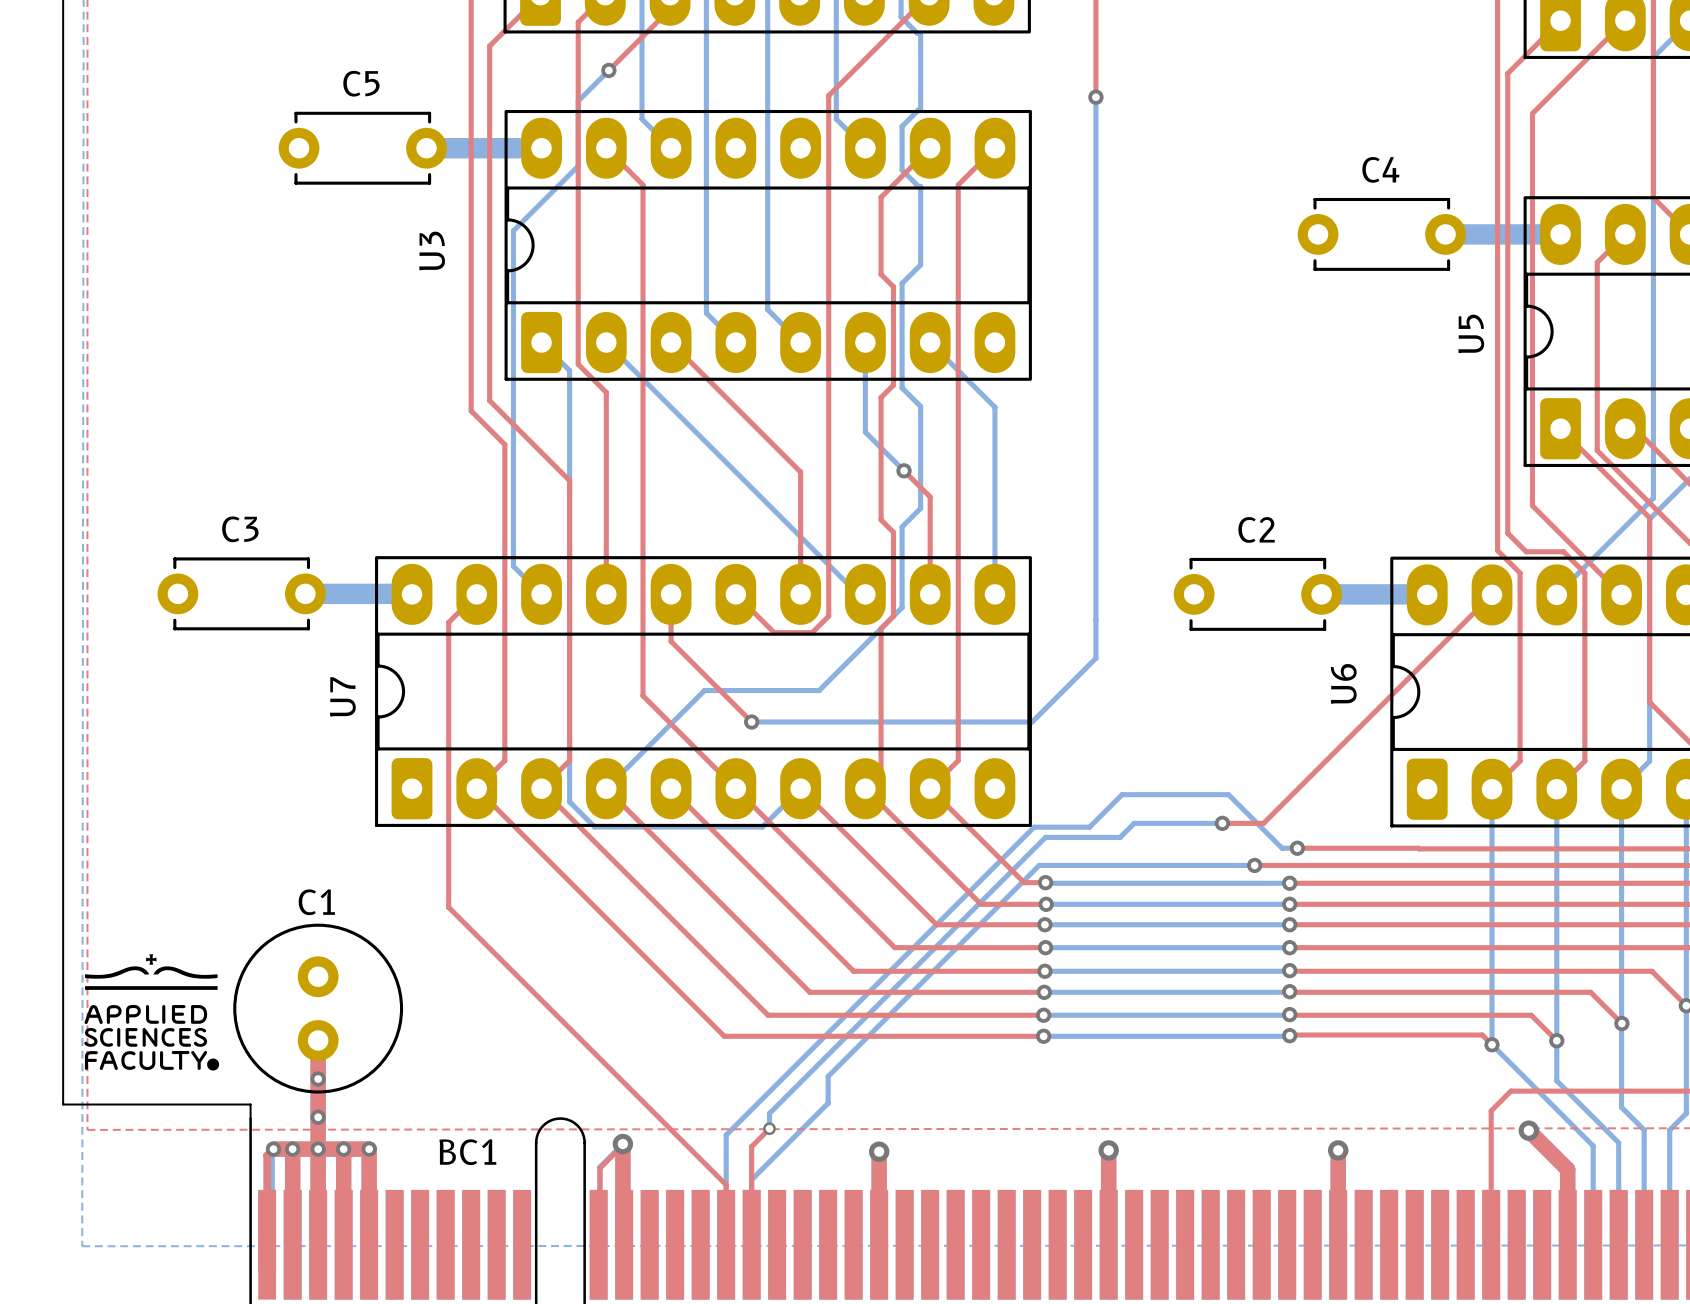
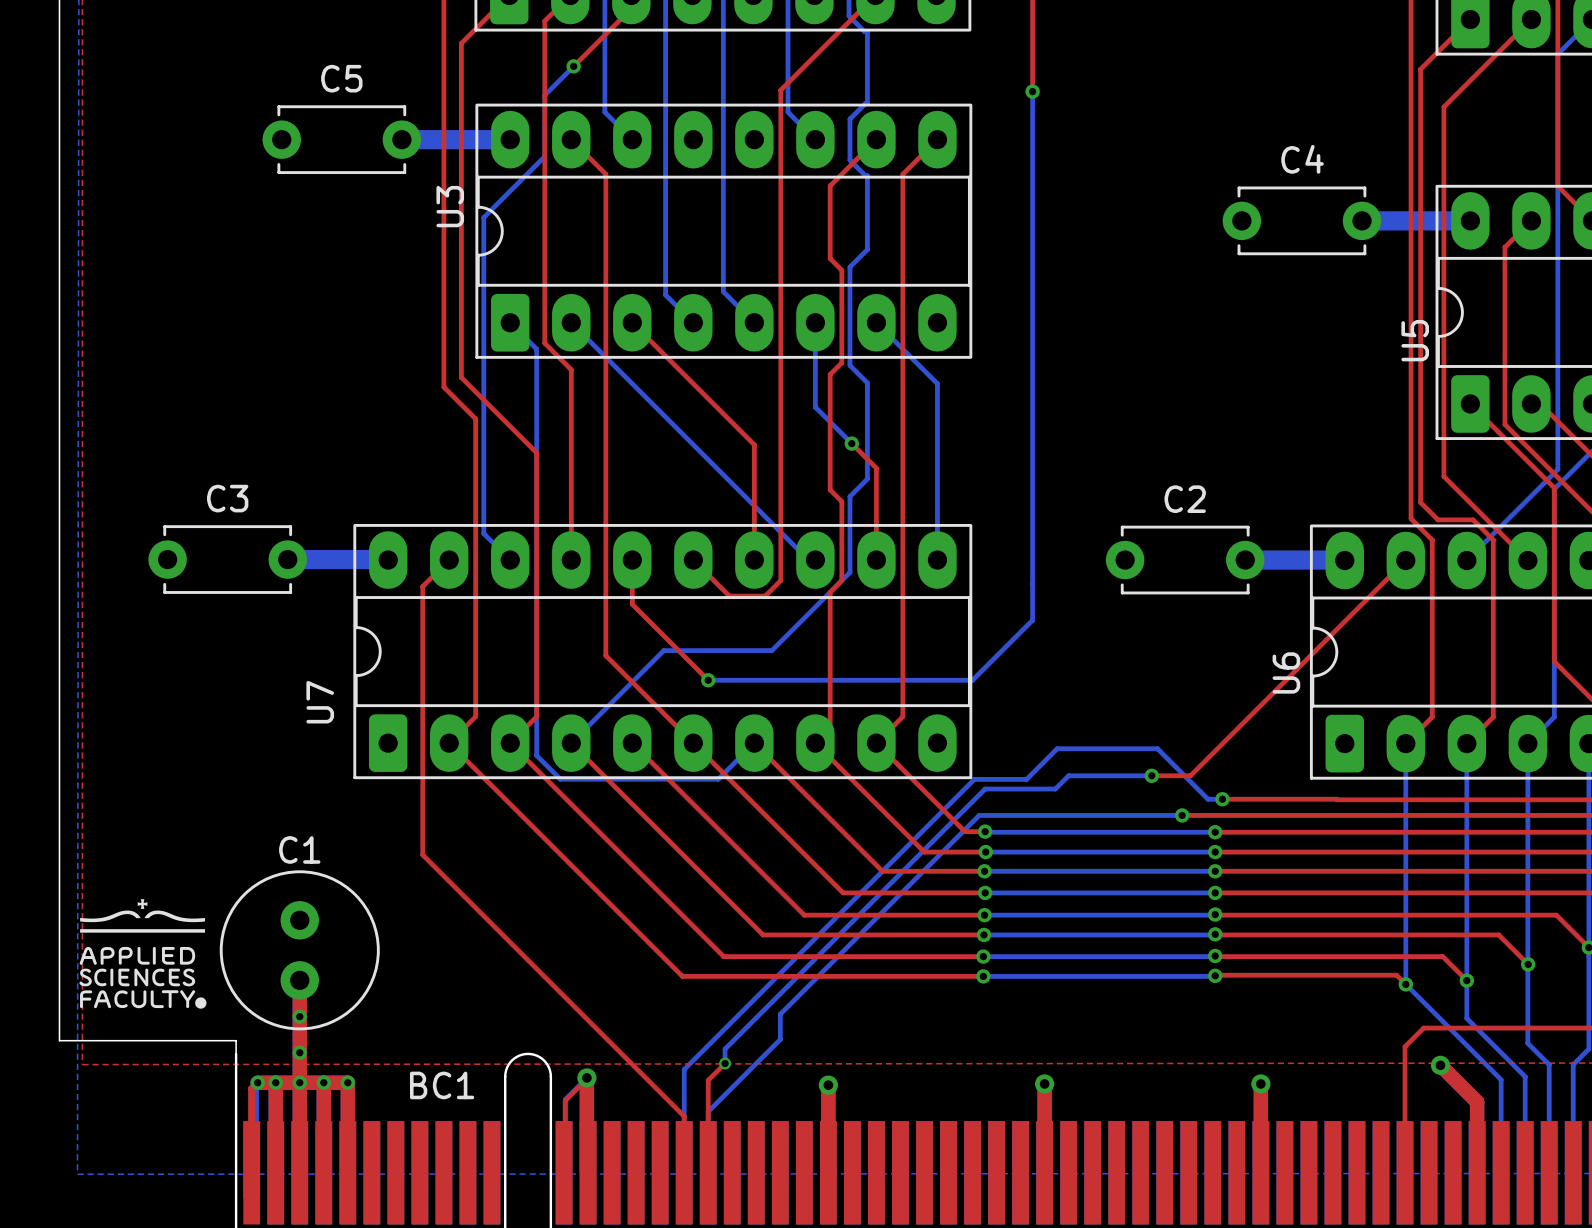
U3 name position: U3 (432, 251) -> U3 (450, 206)
U5 name position: U5 (1471, 333) -> U5 (1415, 340)
U6 name position: U6 (1343, 683) -> U6 (1286, 672)
U7 name position: U7 (342, 696) -> U7 (320, 702)

